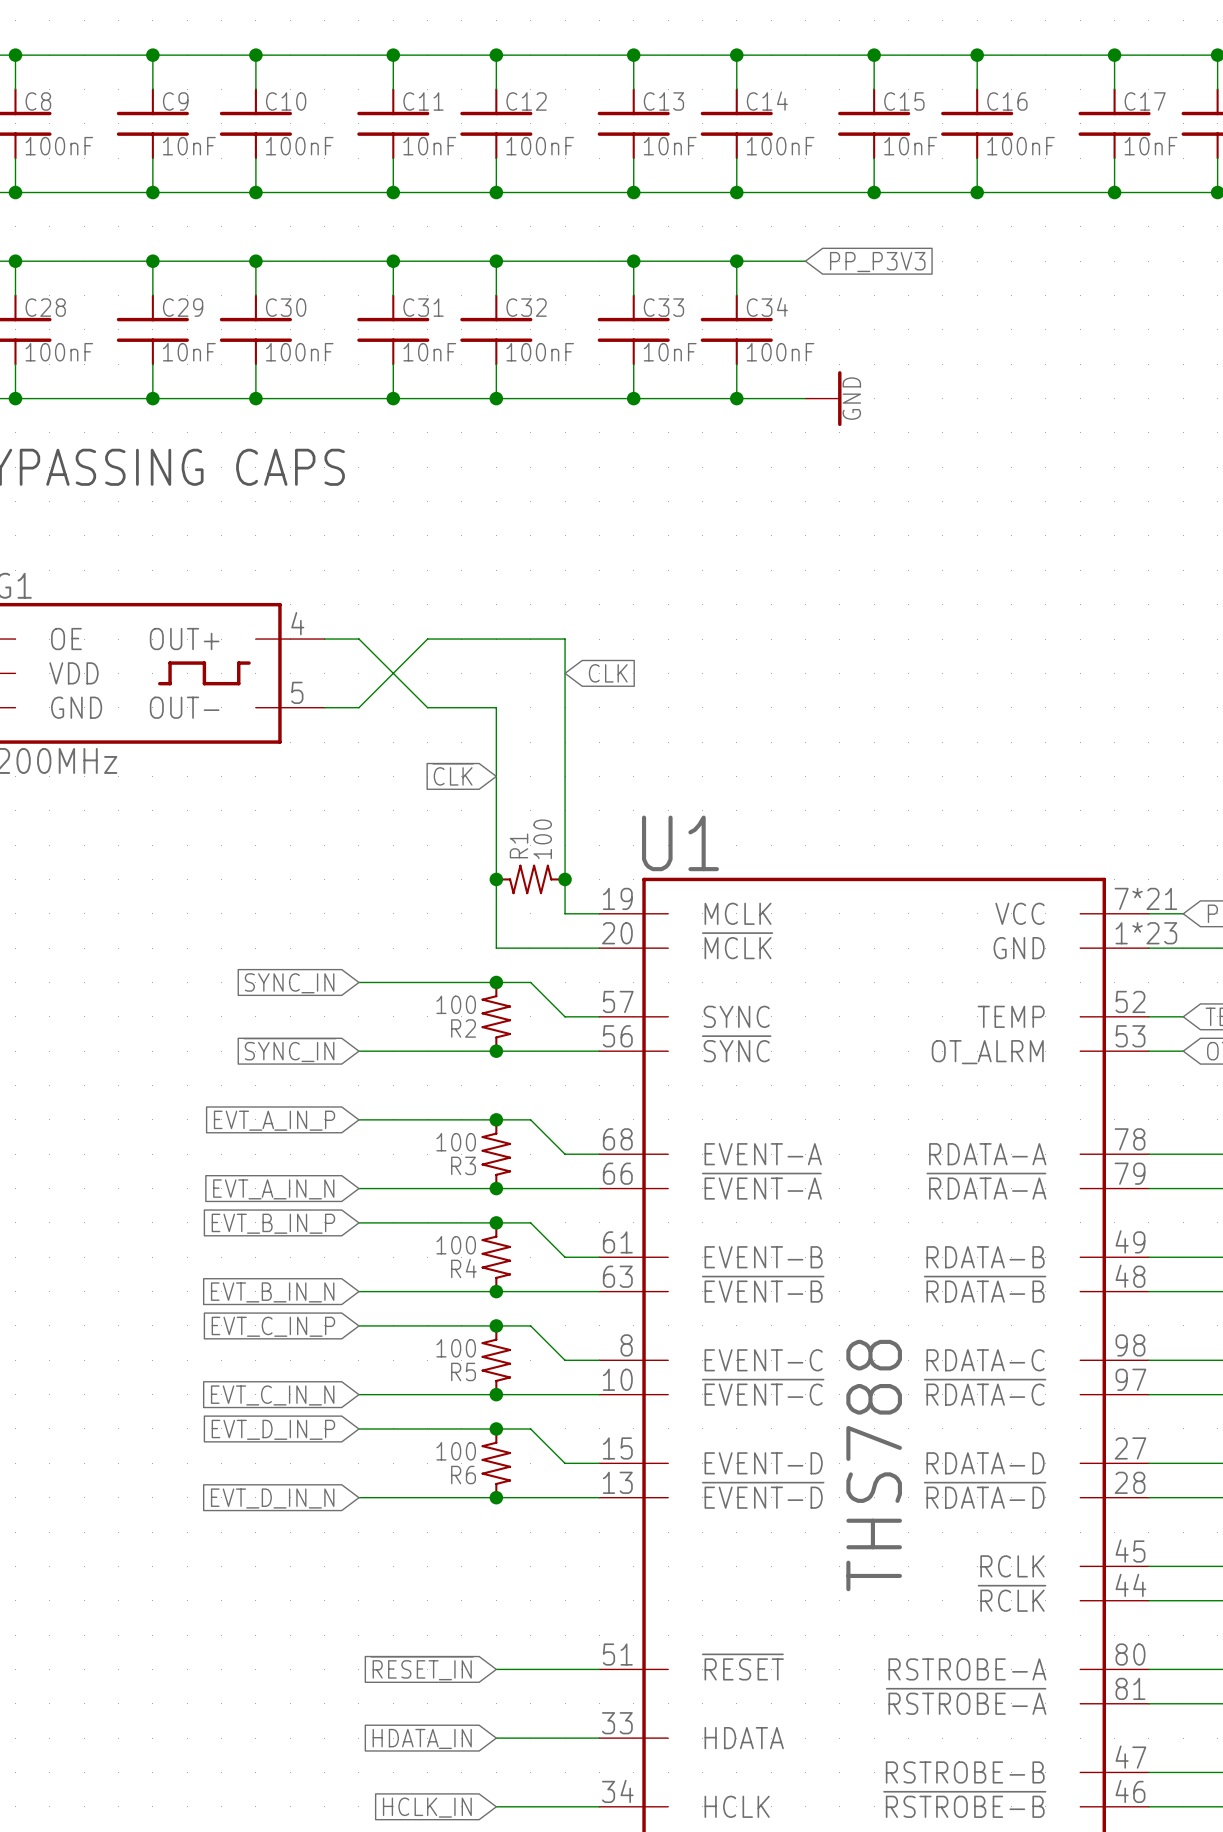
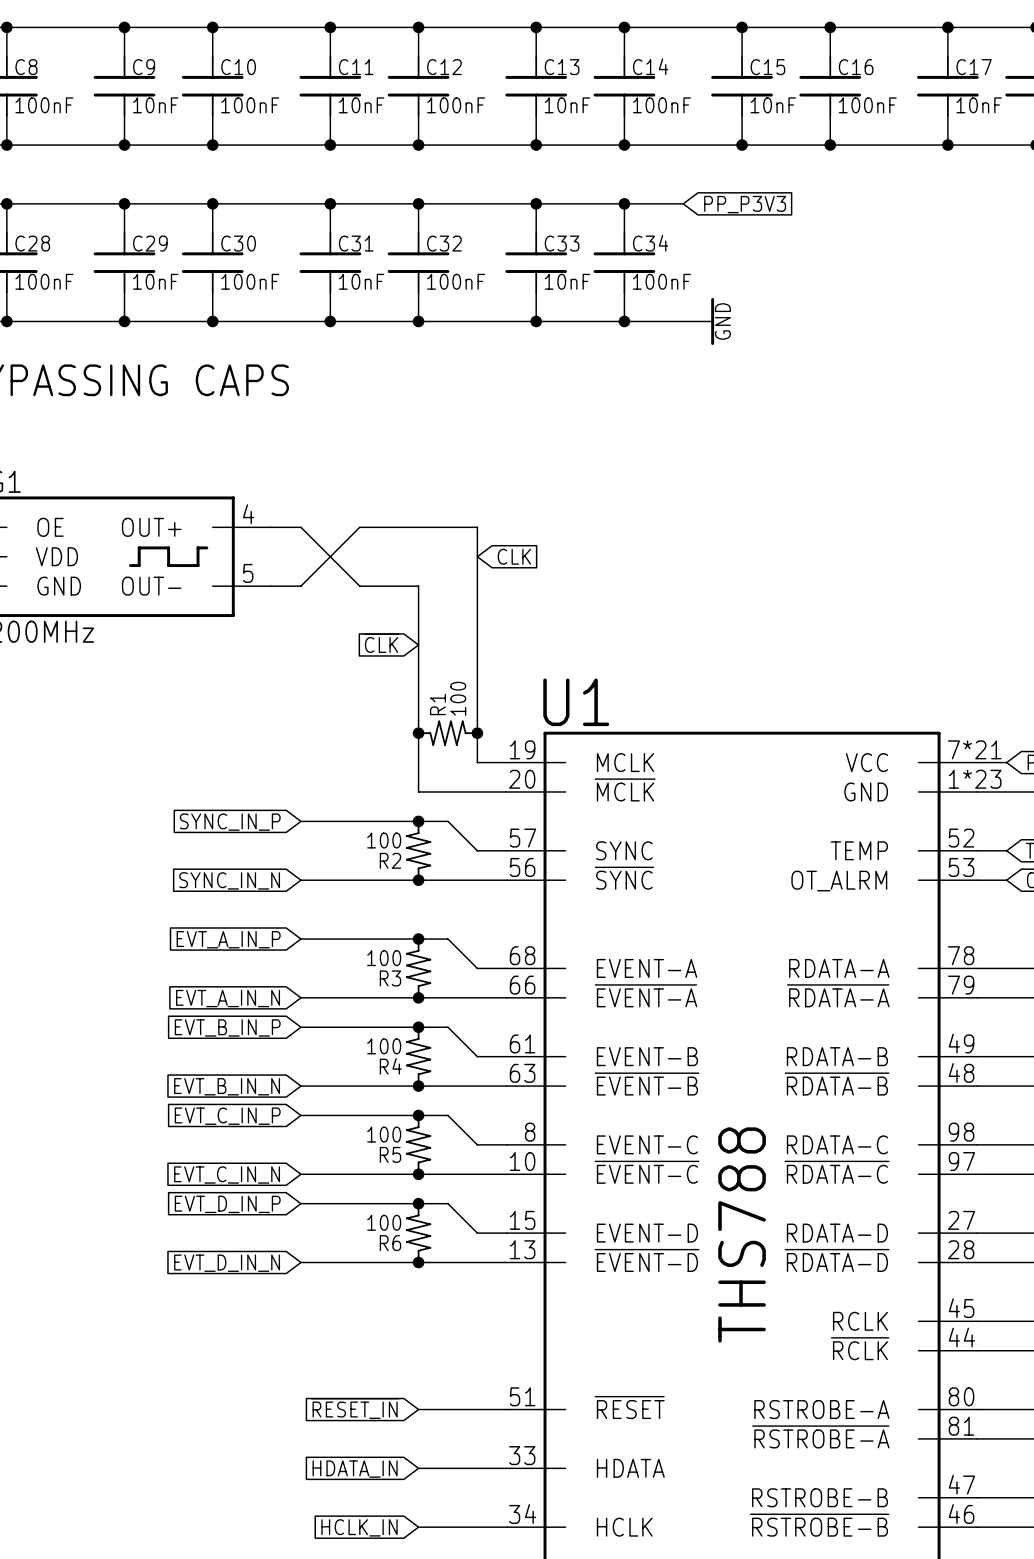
global label: SYNC_IN (289, 983) -> SYNC_IN_P (230, 822)
global label: ~{SYNC_IN} (289, 1050) -> SYNC_IN_N (229, 880)

